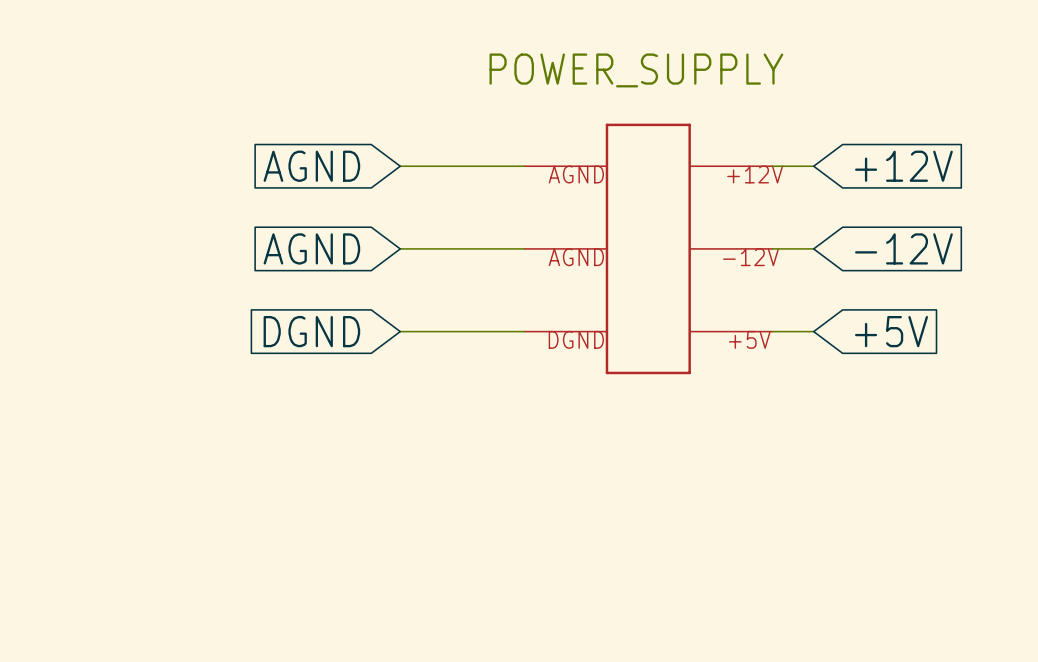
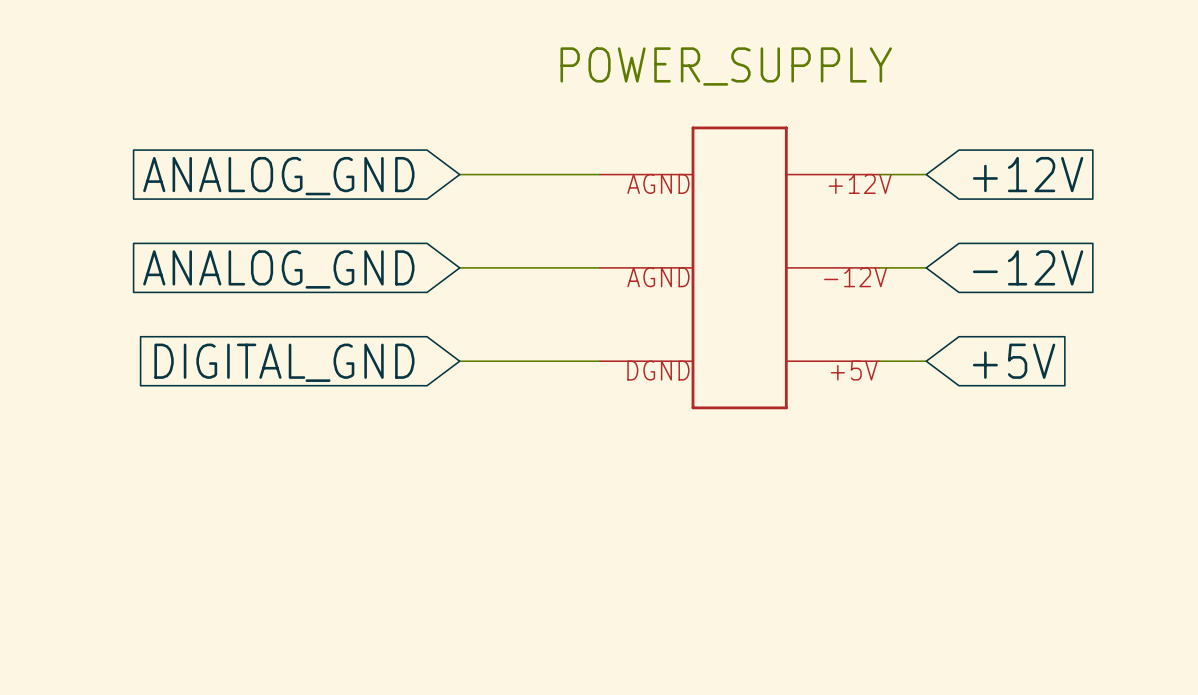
global label: AGND (311, 166) -> ANALOG_GND (278, 176)
global label: AGND (311, 248) -> ANALOG_GND (278, 269)
global label: DGND (311, 331) -> DIGITAL_GND (284, 362)

